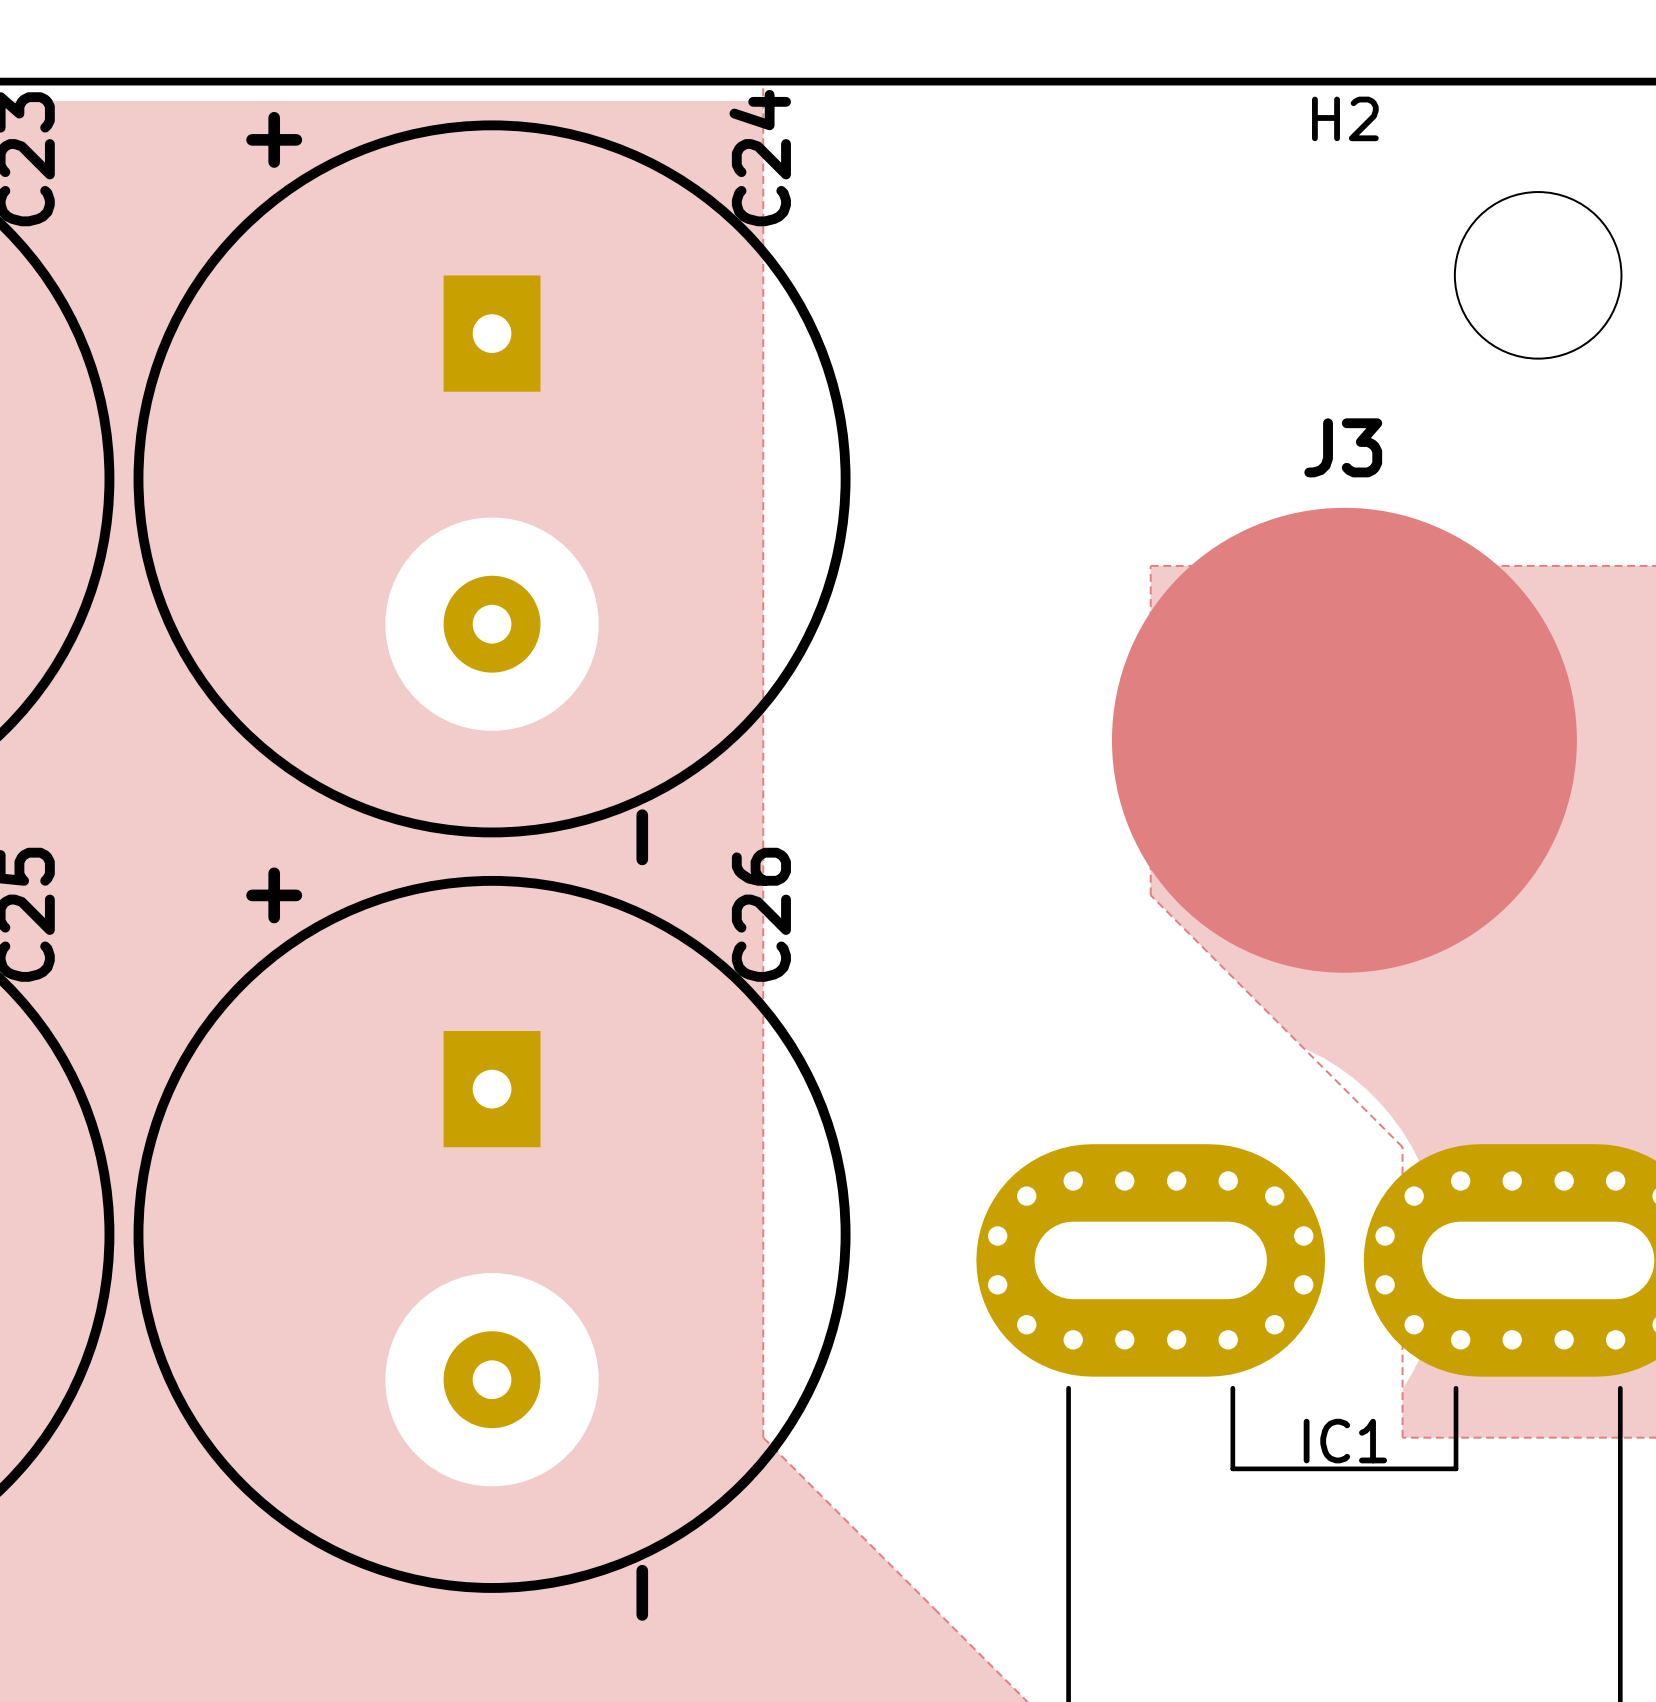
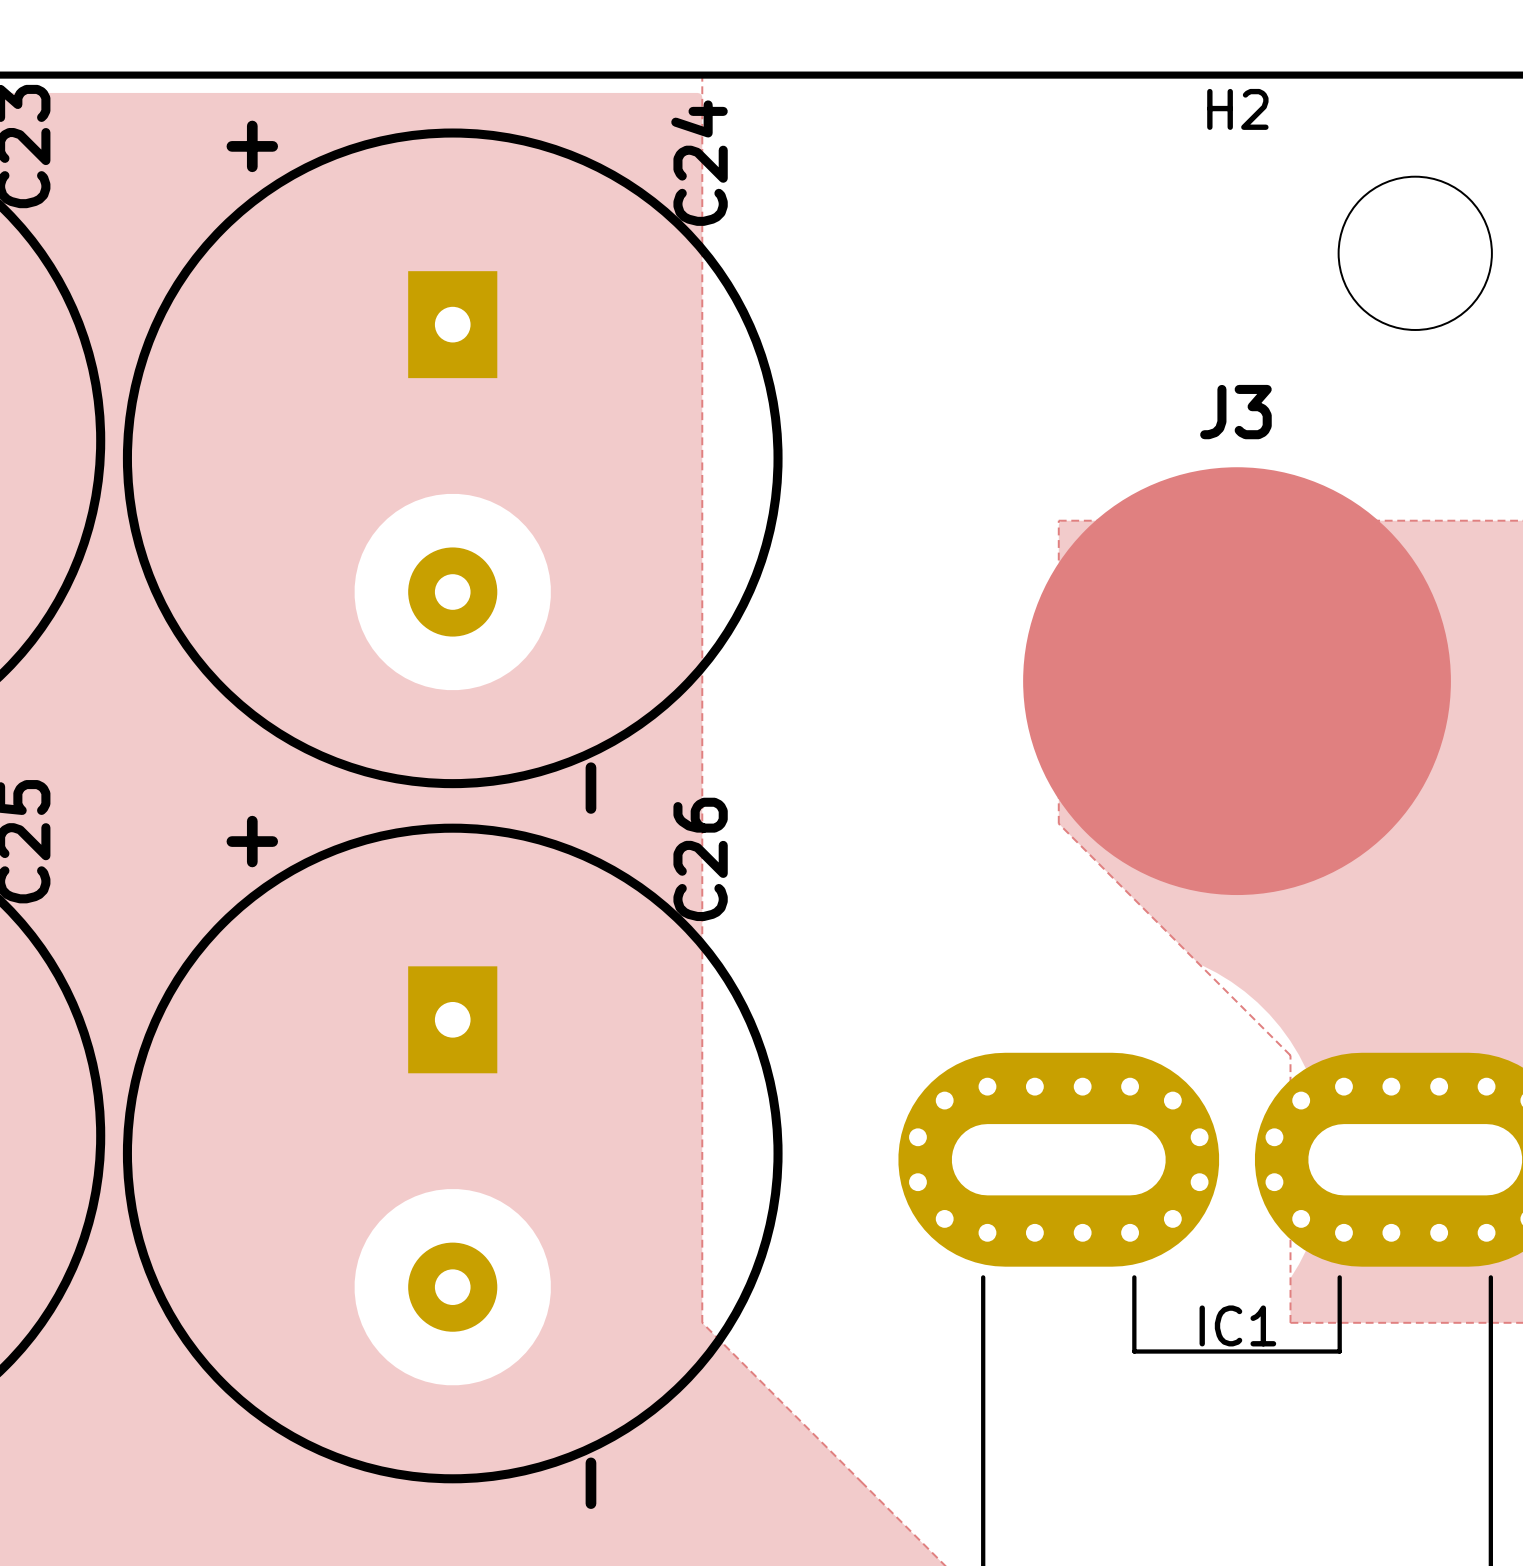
C24 position: (492, 478) -> (452, 458)
C26 position: (492, 1234) -> (452, 1153)

